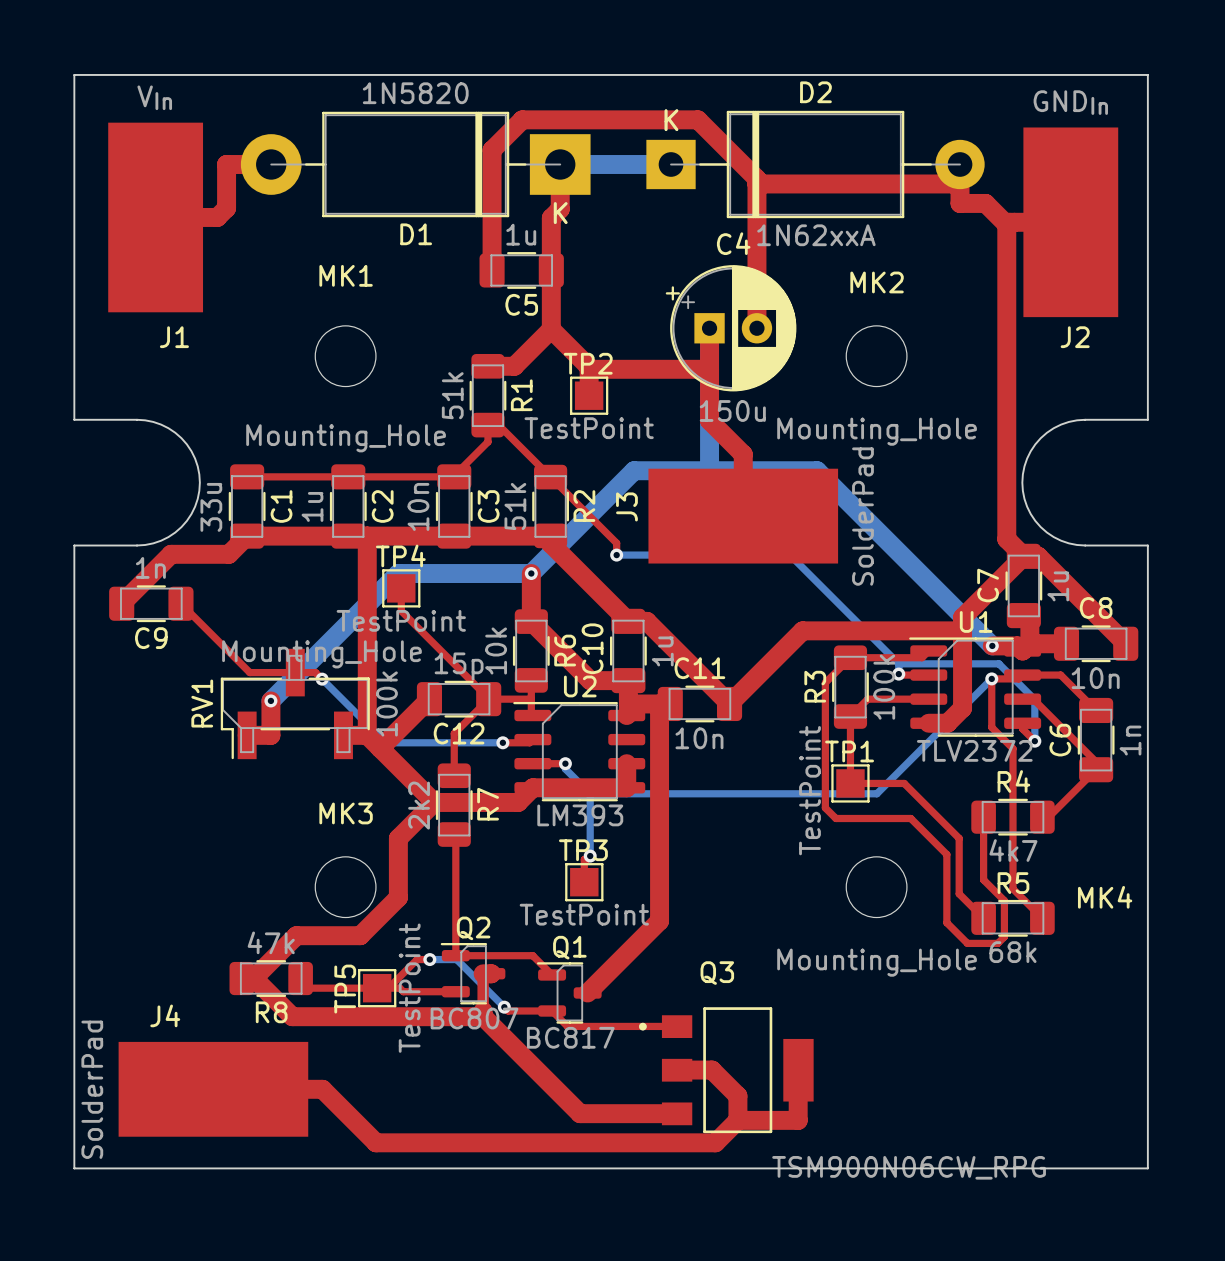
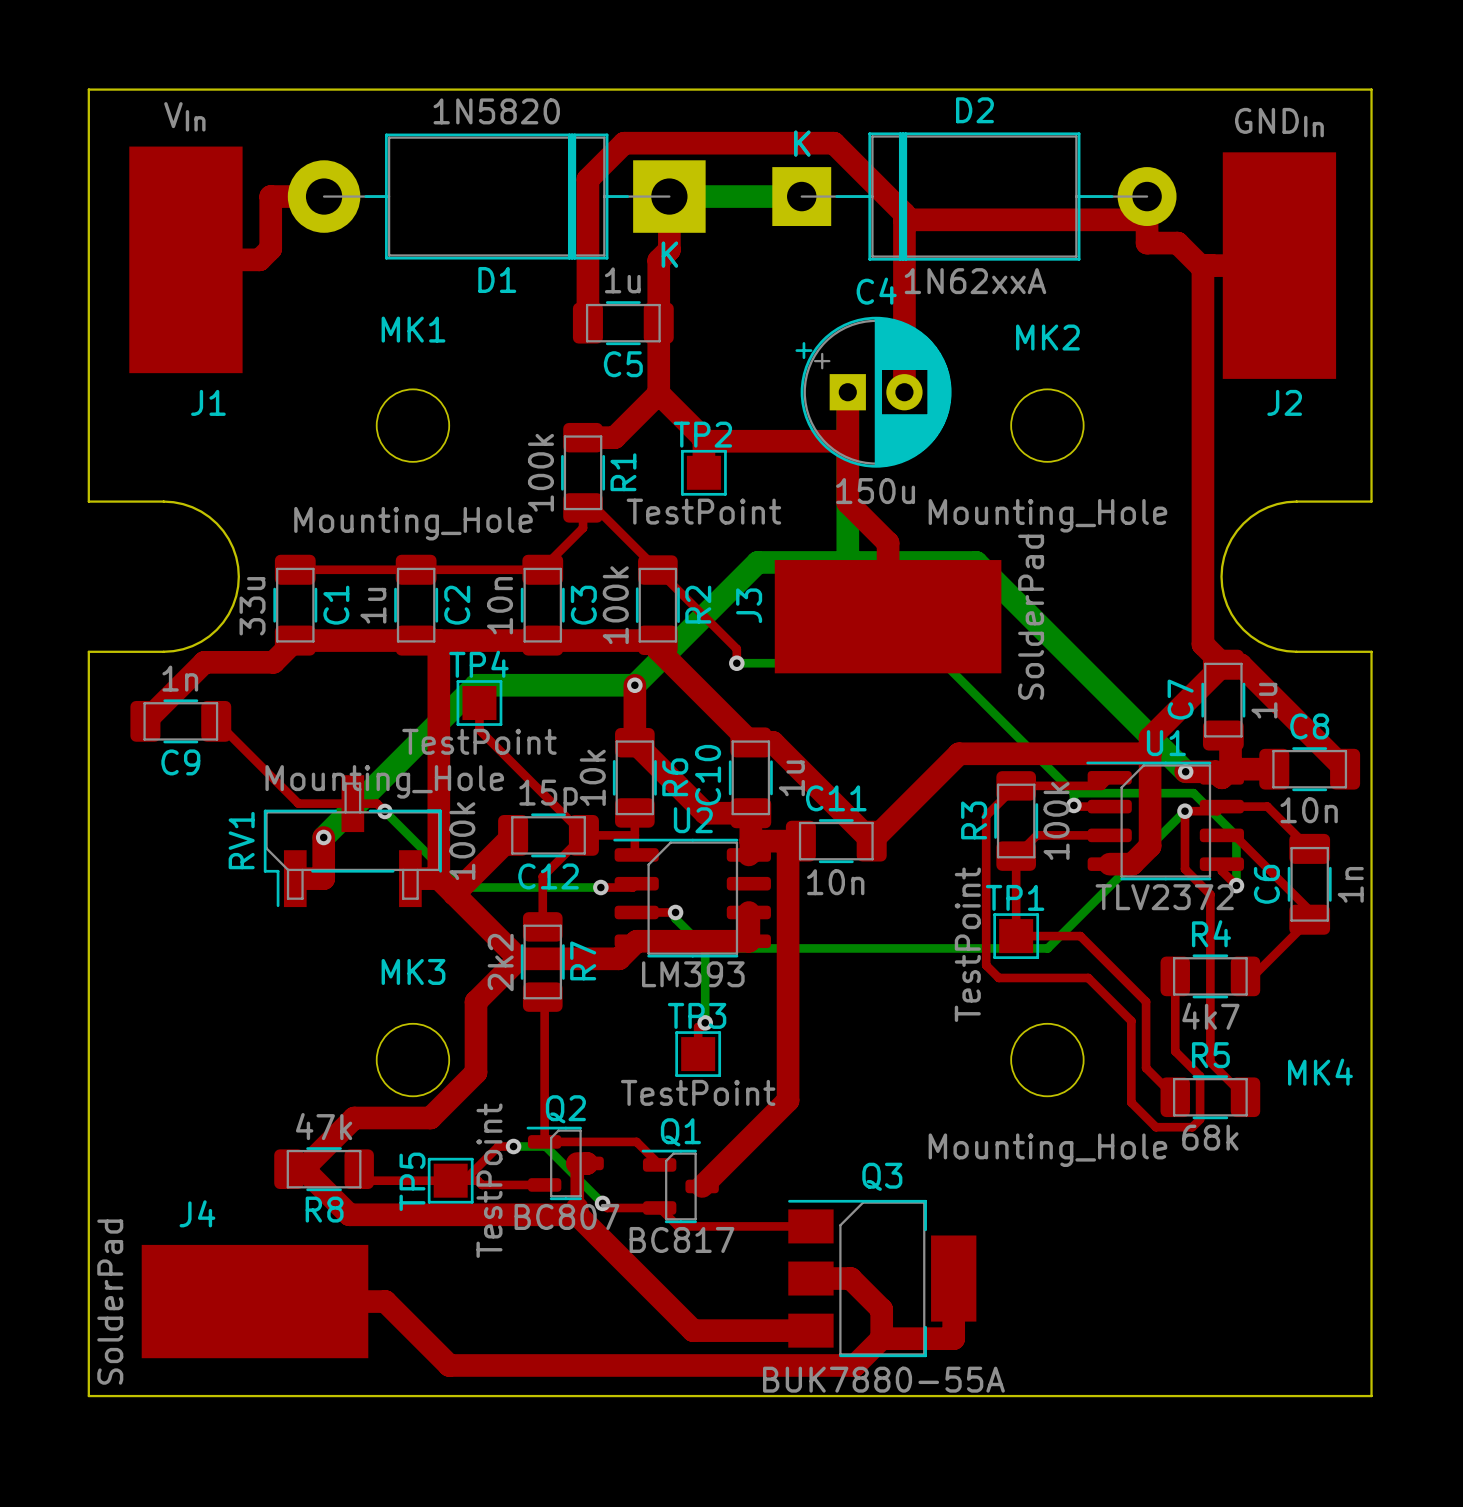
R1 value: 51k (452, 395) -> 100k (540, 472)
R2 value: 51k (515, 506) -> 100k (615, 605)
Q3 footprint: [639, 1007, 814, 1134] -> [788, 1199, 977, 1358]
Q3 value: TSM900N06CW_RPG (909, 1167) -> BUK7880-55A (883, 1379)

